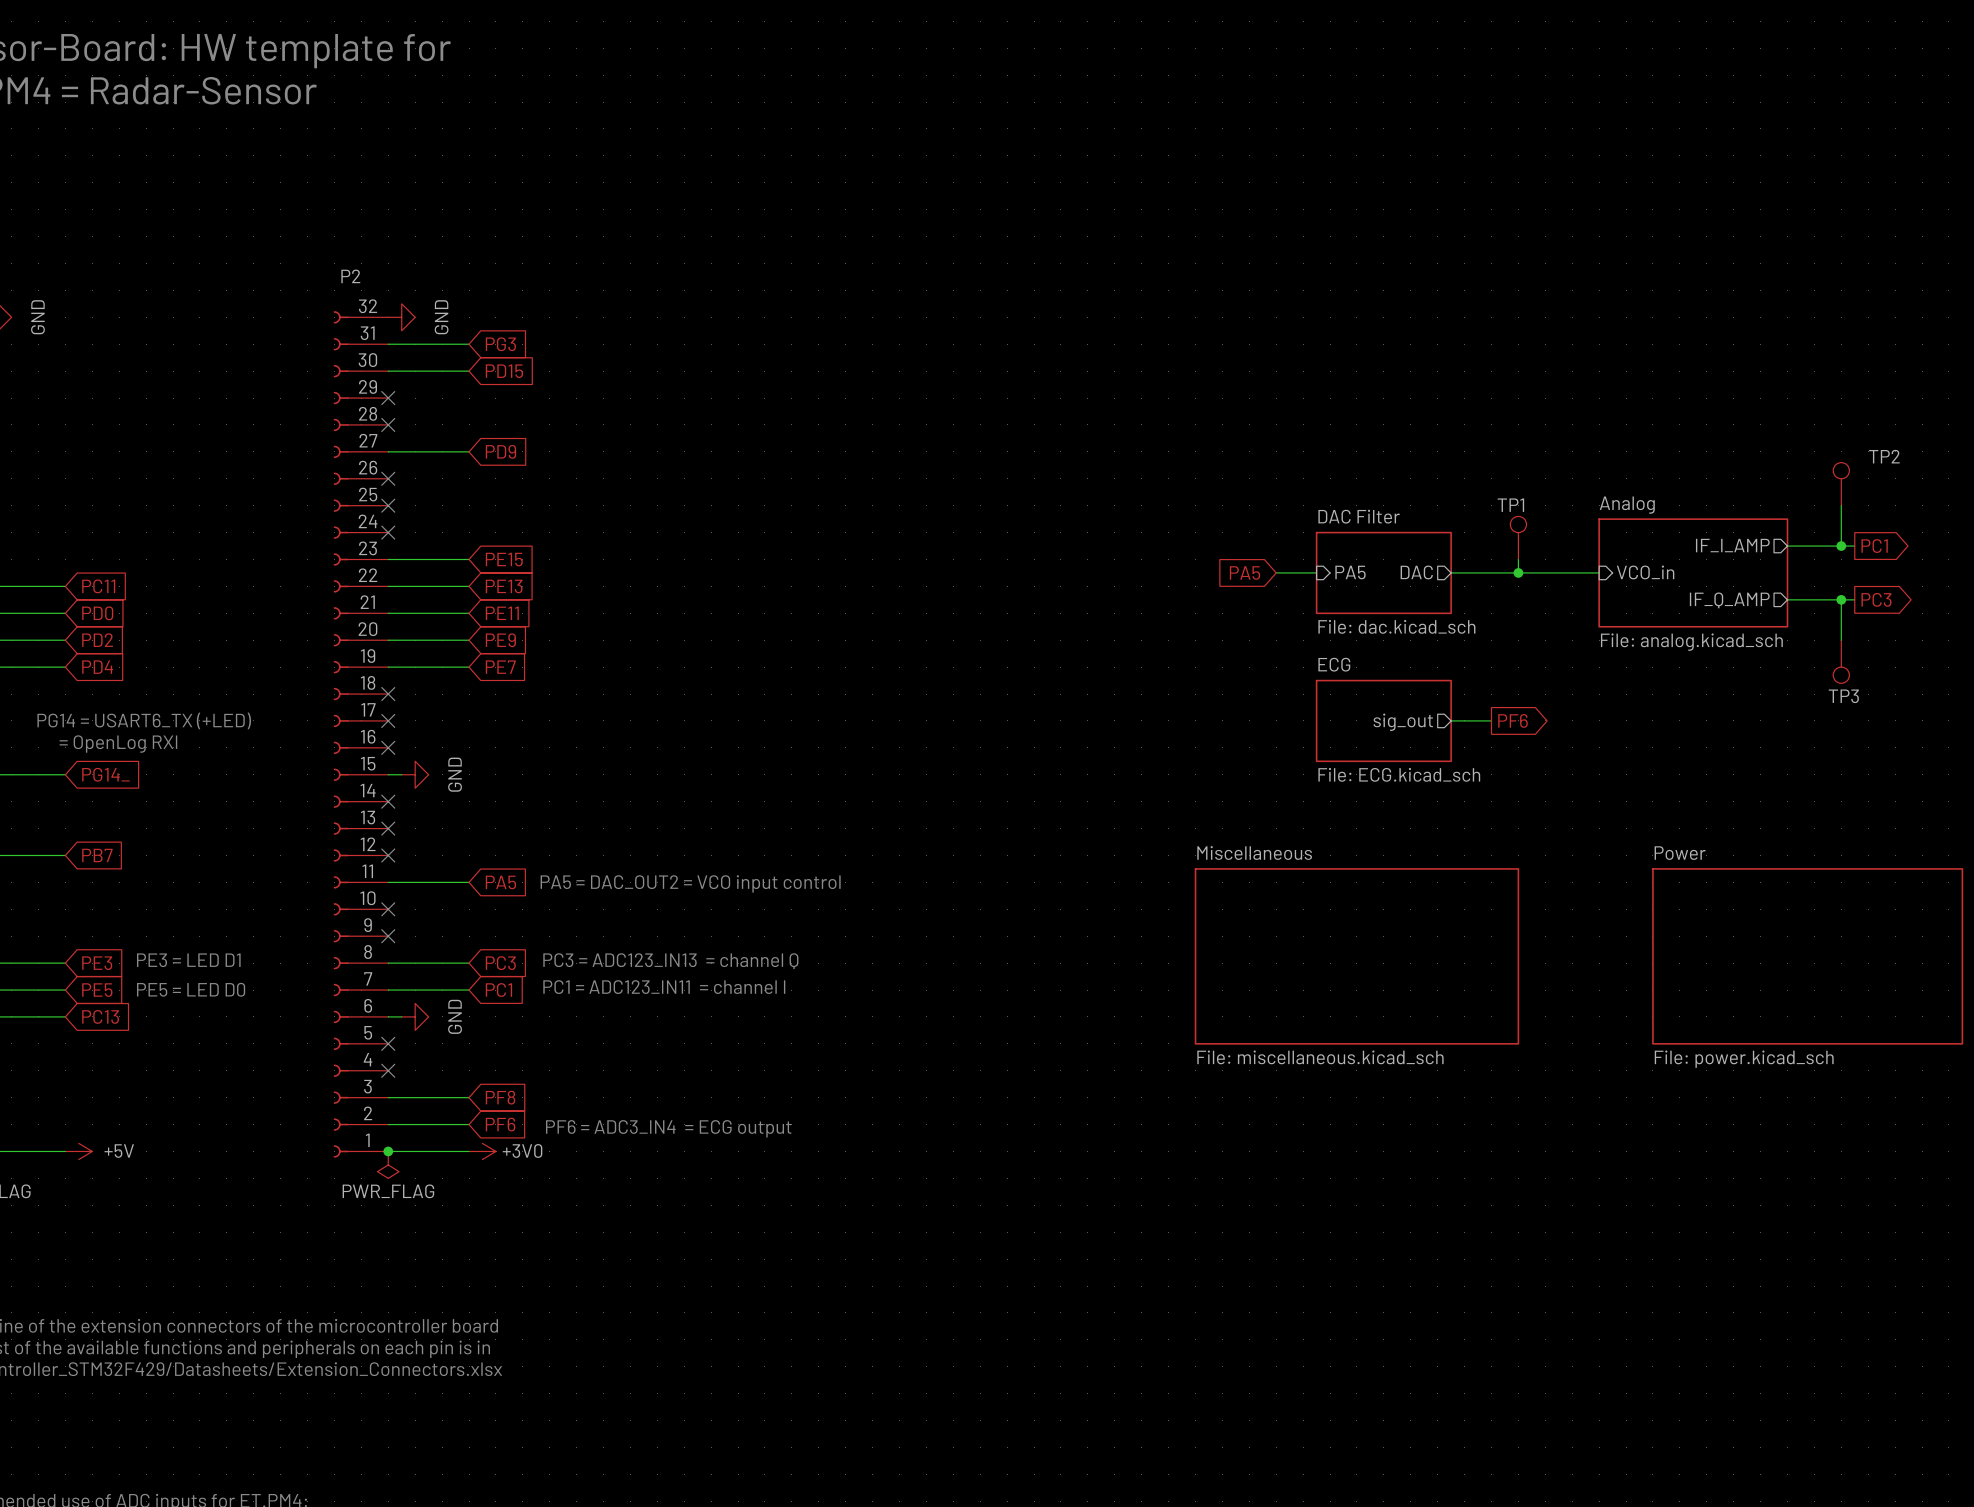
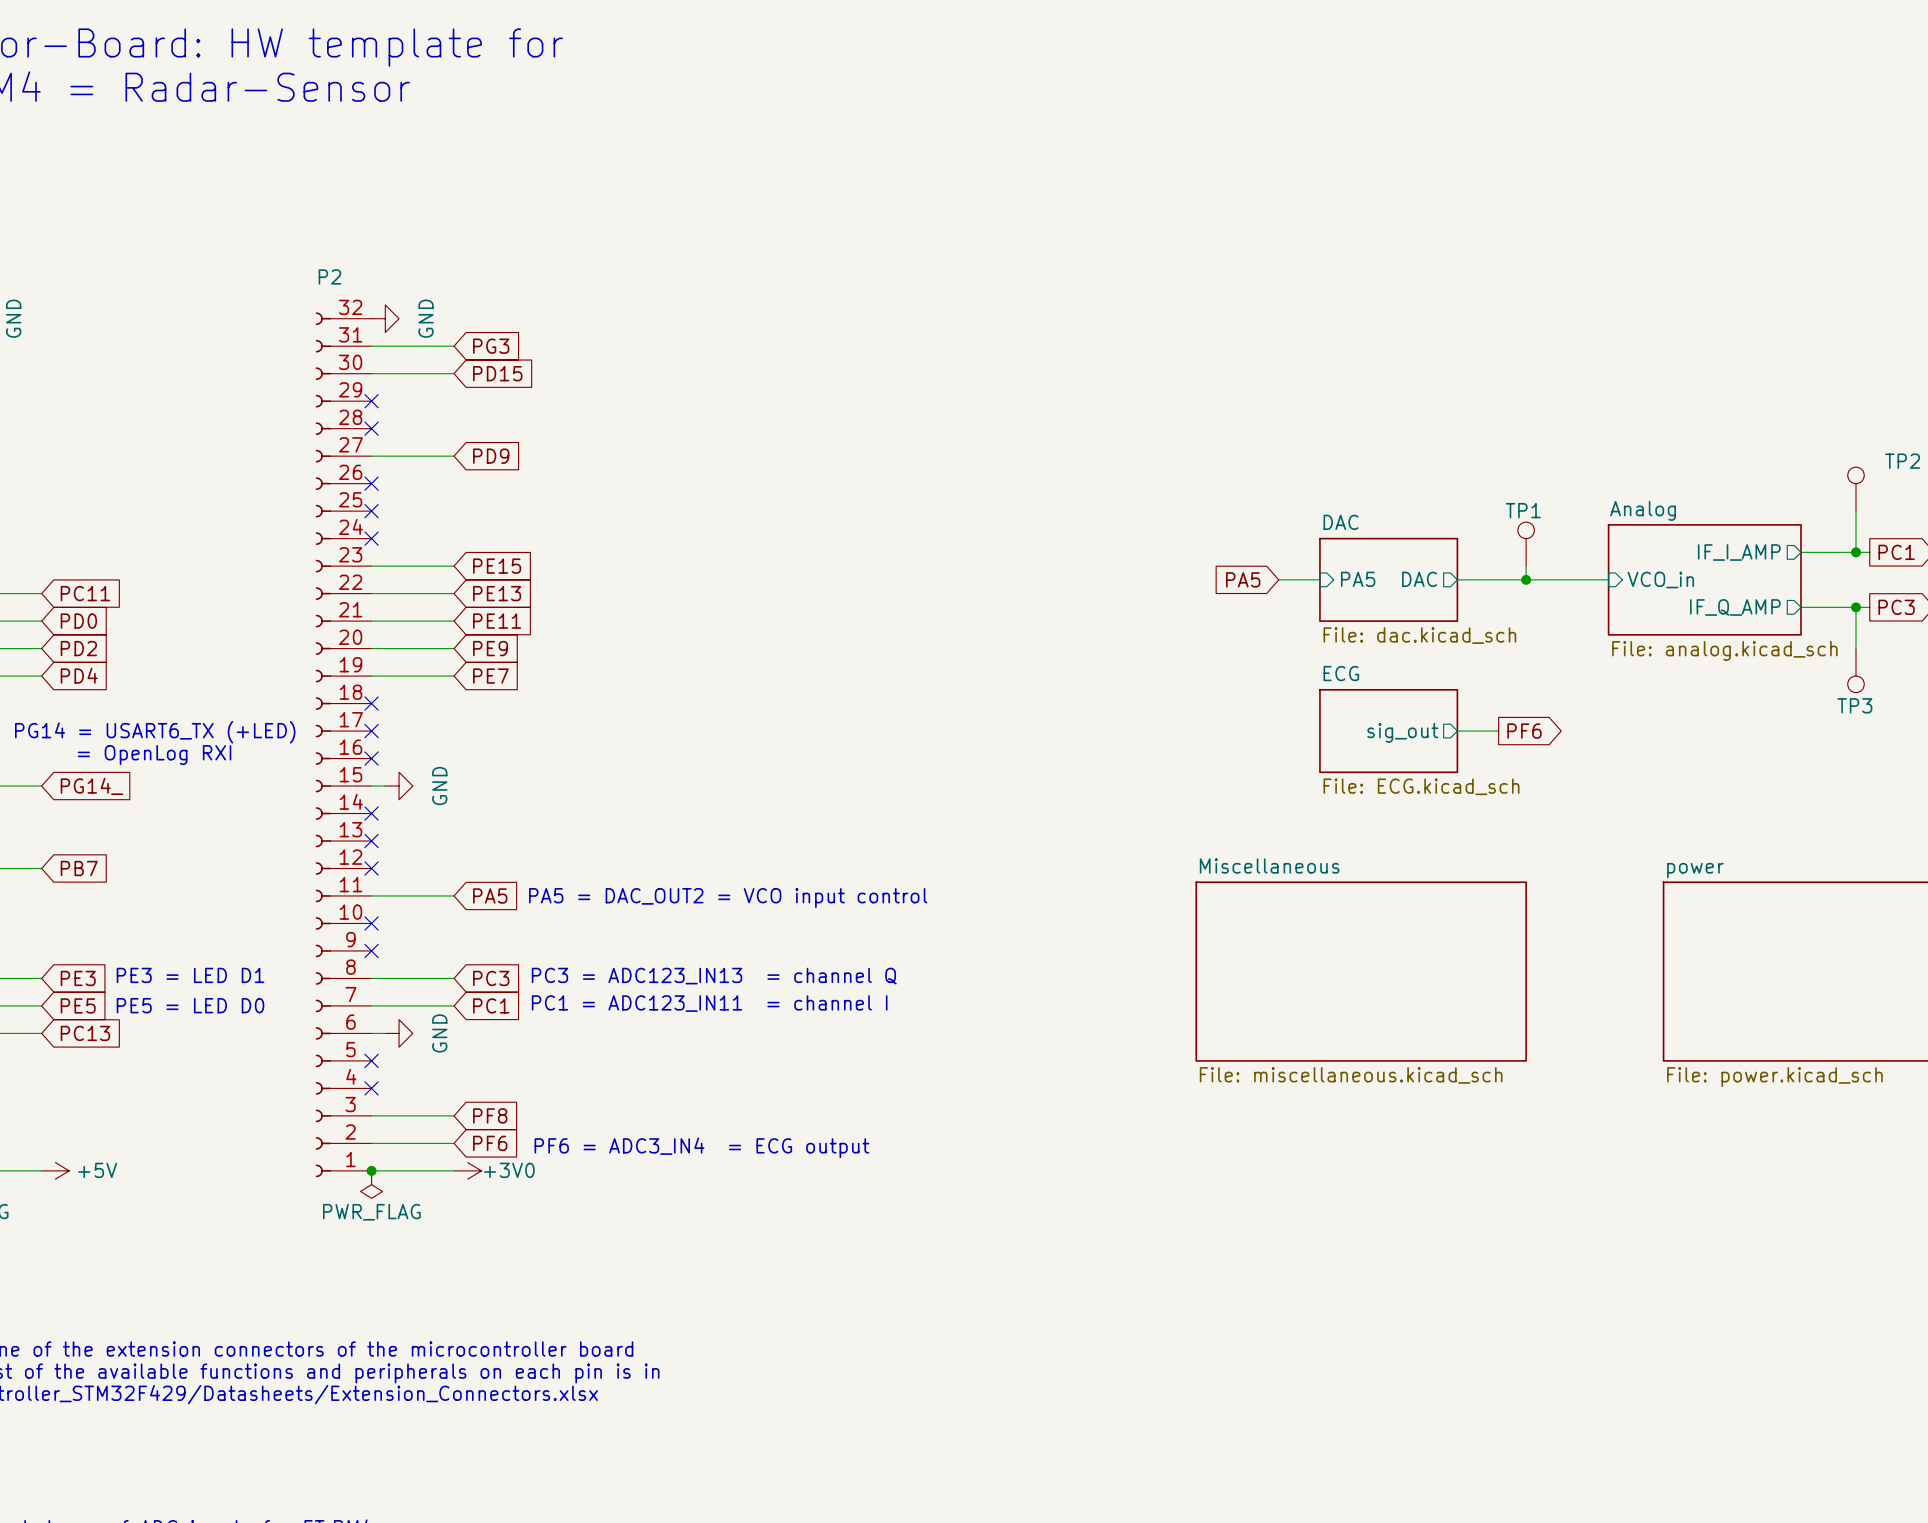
sheet DAC Filter name: DAC Filter (1359, 516) -> DAC (1341, 522)
sheet Power name: Power (1680, 853) -> power (1695, 870)

